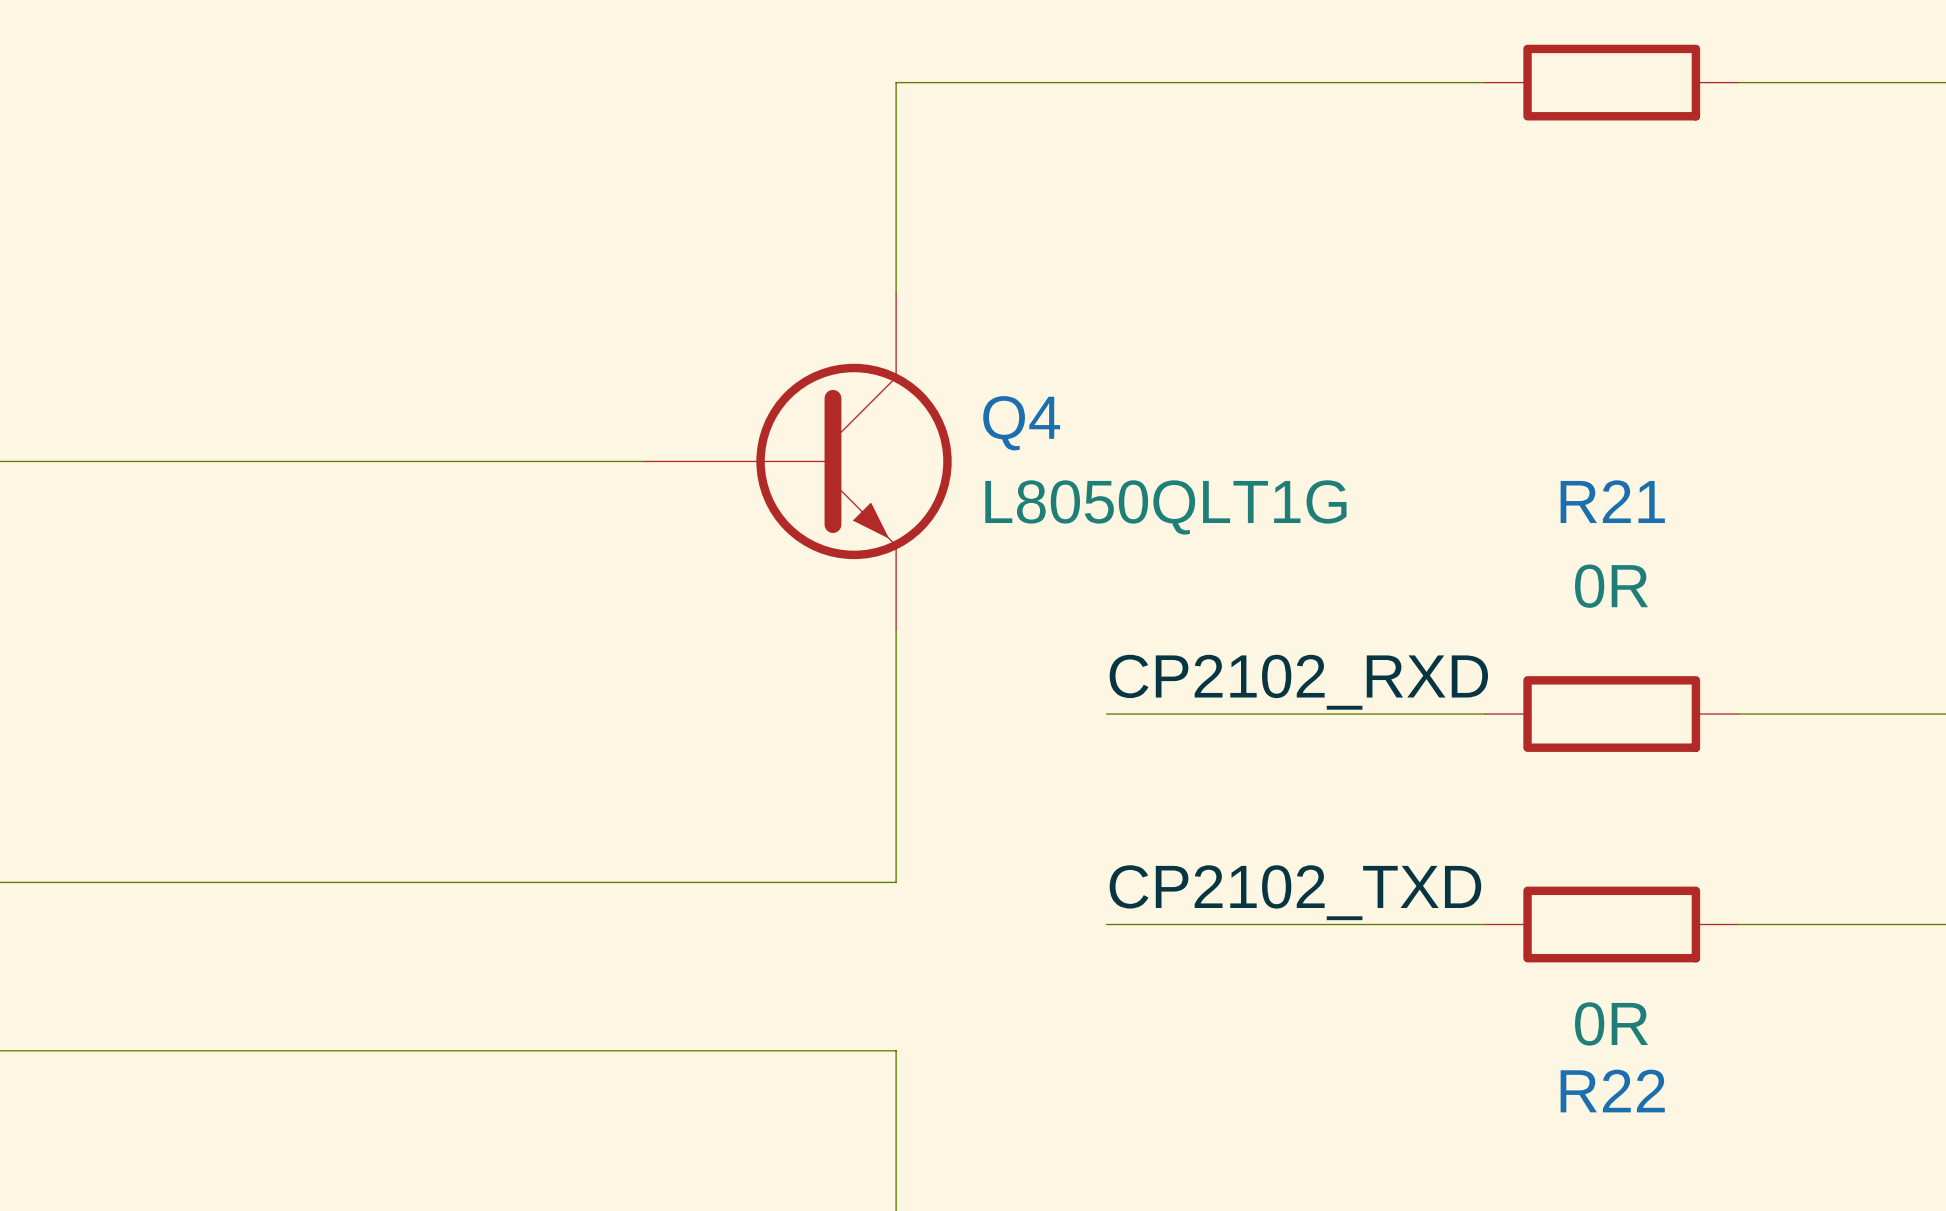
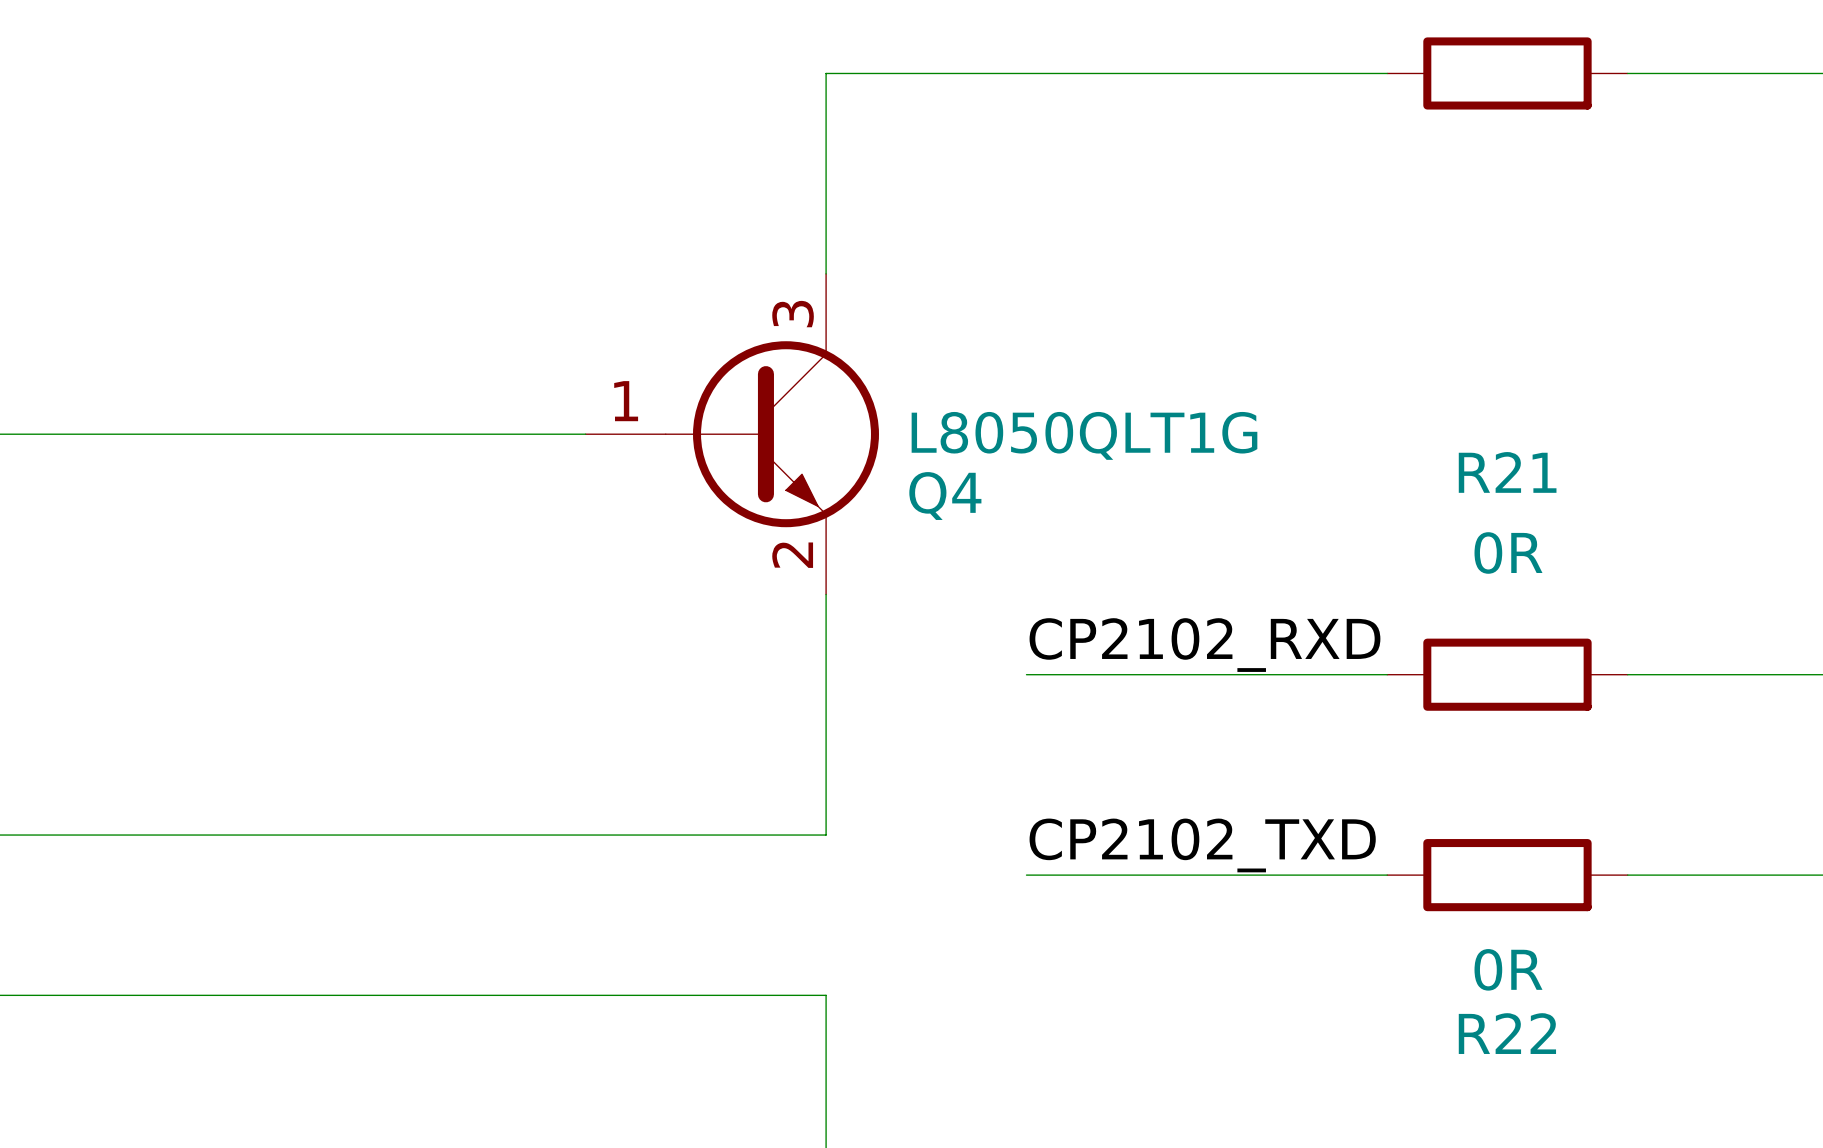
Q4 pin number: none -> 3 (793, 314)
Q4 name position: Q4 (1021, 423) -> Q4 (945, 496)
Q4 pin number: none -> 1 (626, 401)
Q4 value position: L8050QLT1G (1165, 507) -> L8050QLT1G (1084, 435)
Q4 pin number: none -> 2 (792, 555)

